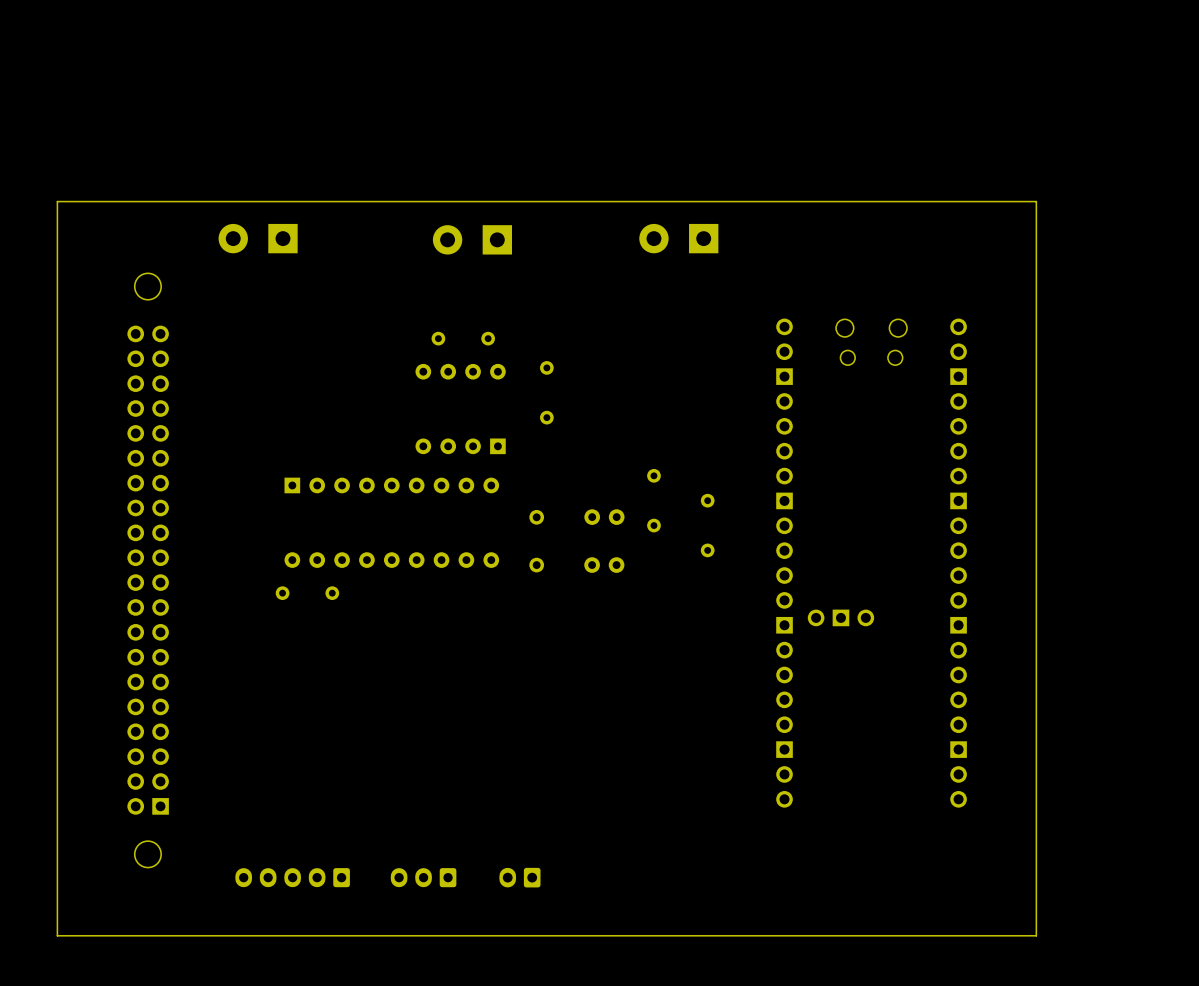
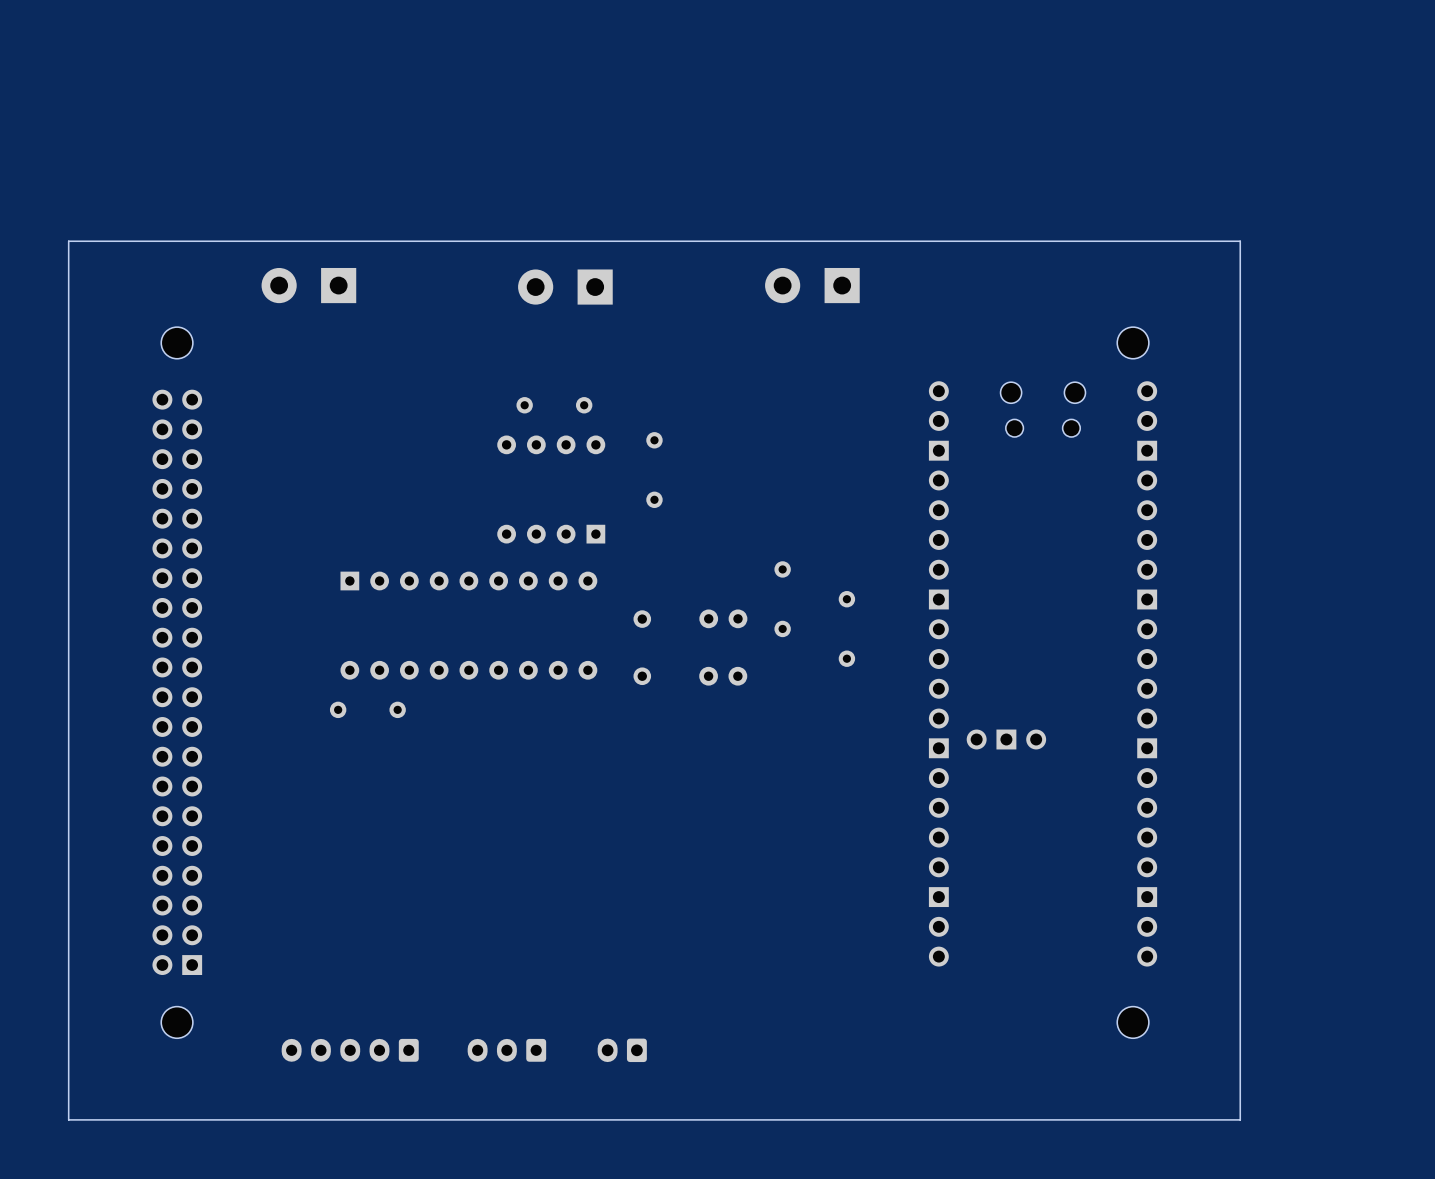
part: none -> (1133, 342)
part: none -> (1133, 1022)

